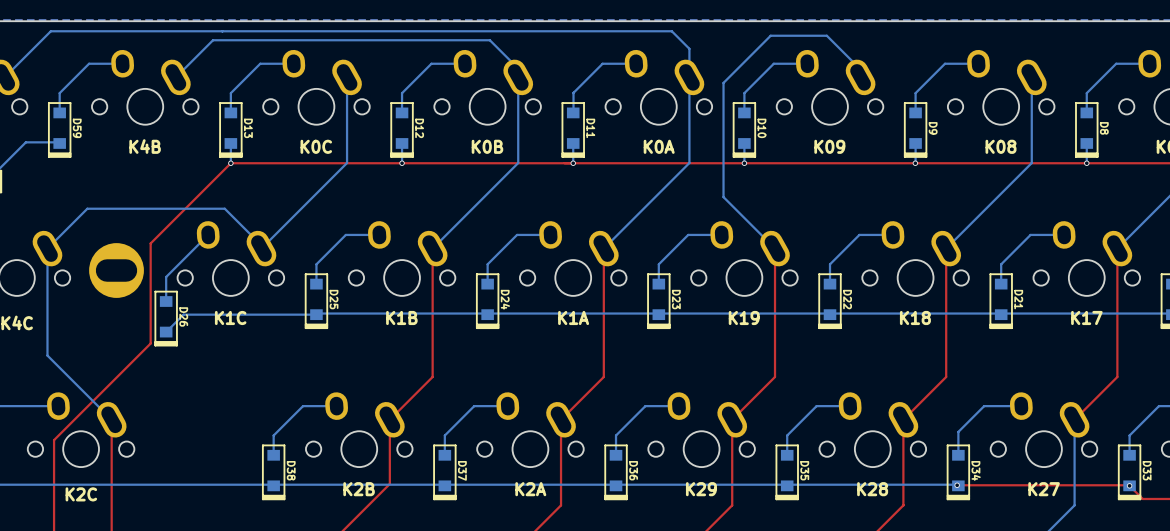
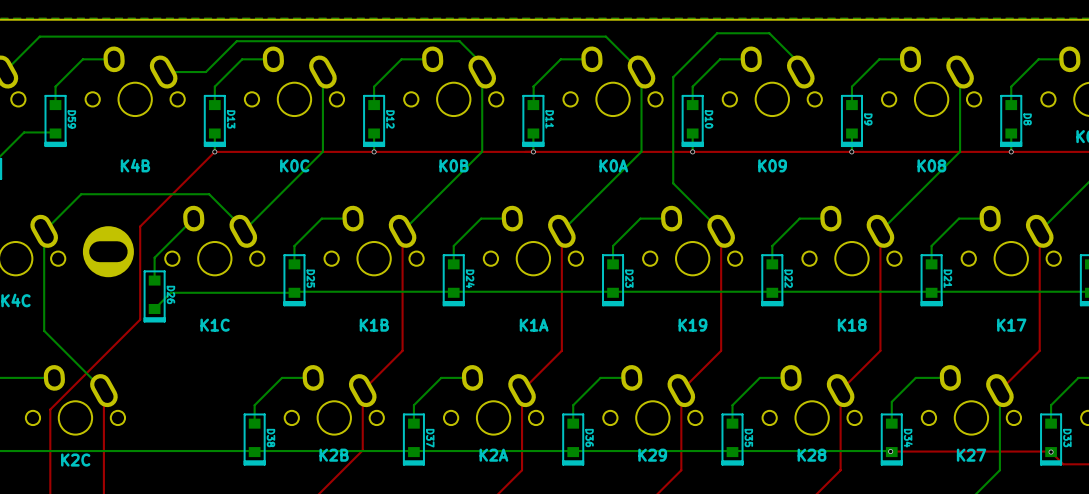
bottom track: (42, 39) (50, 31) (671, 31) (689, 48) (689, 77) -> (39, 36) (605, 36) (641, 72)
bottom track: (493, 44) (489, 40) (213, 40) (175, 77) -> (459, 41) (236, 41) (205, 72) (163, 72)
part value position: K4B (145, 146) -> K4B (135, 165)
part value position: K0C (316, 146) -> K0C (294, 165)
part value position: K0B (487, 146) -> K0B (454, 165)
part value position: K0A (659, 146) -> K0A (613, 165)
part value position: K09 (829, 146) -> K09 (772, 165)
part value position: K08 (1001, 146) -> K08 (931, 165)
part value position: K1C (230, 317) -> K1C (215, 325)
part value position: K1B (401, 317) -> K1B (374, 325)
part value position: K1A (573, 317) -> K1A (534, 325)
part value position: K19 (744, 317) -> K19 (692, 325)
part value position: K18 (915, 317) -> K18 (852, 325)
part value position: K17 (1086, 317) -> K17 (1011, 325)

